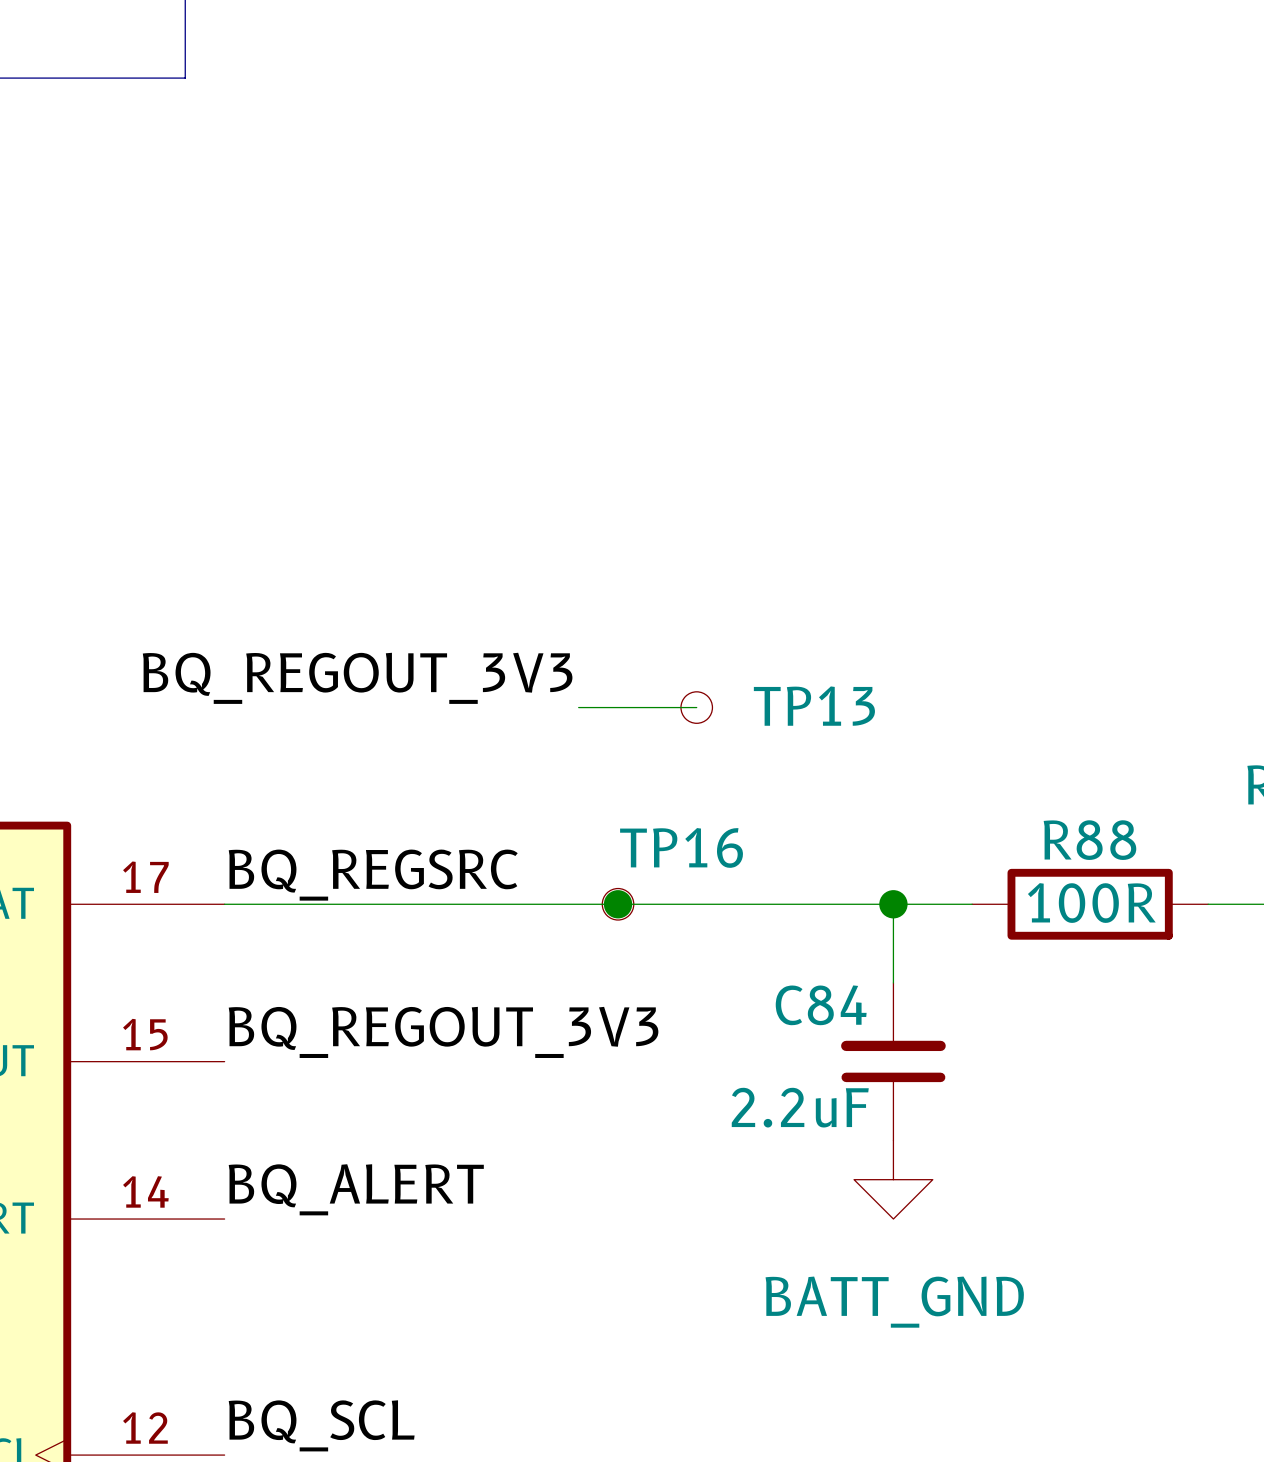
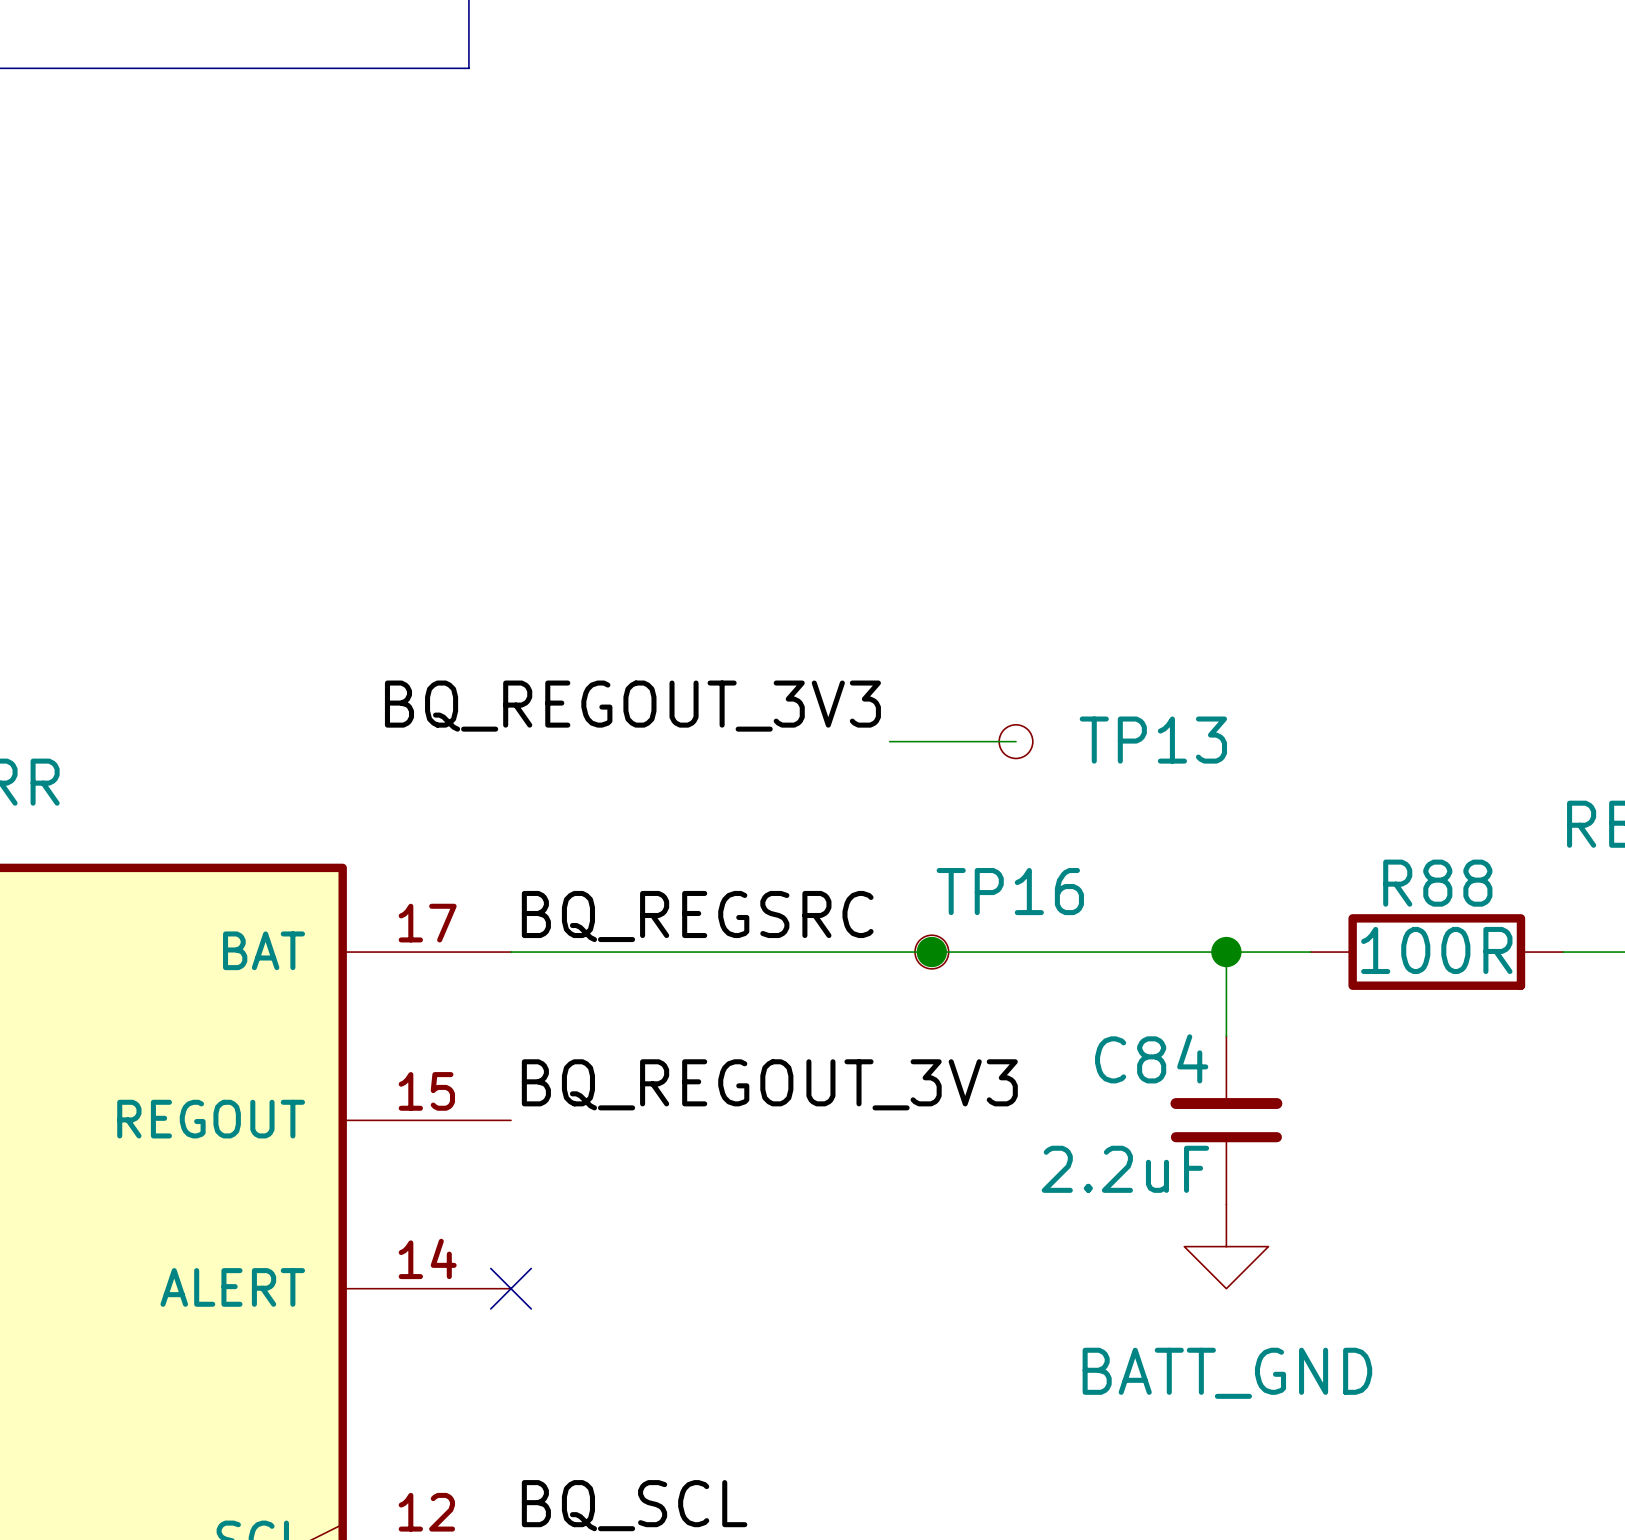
label: BQ_ALERT (356, 1189) -> none
no-connect mark: none -> (511, 1288)

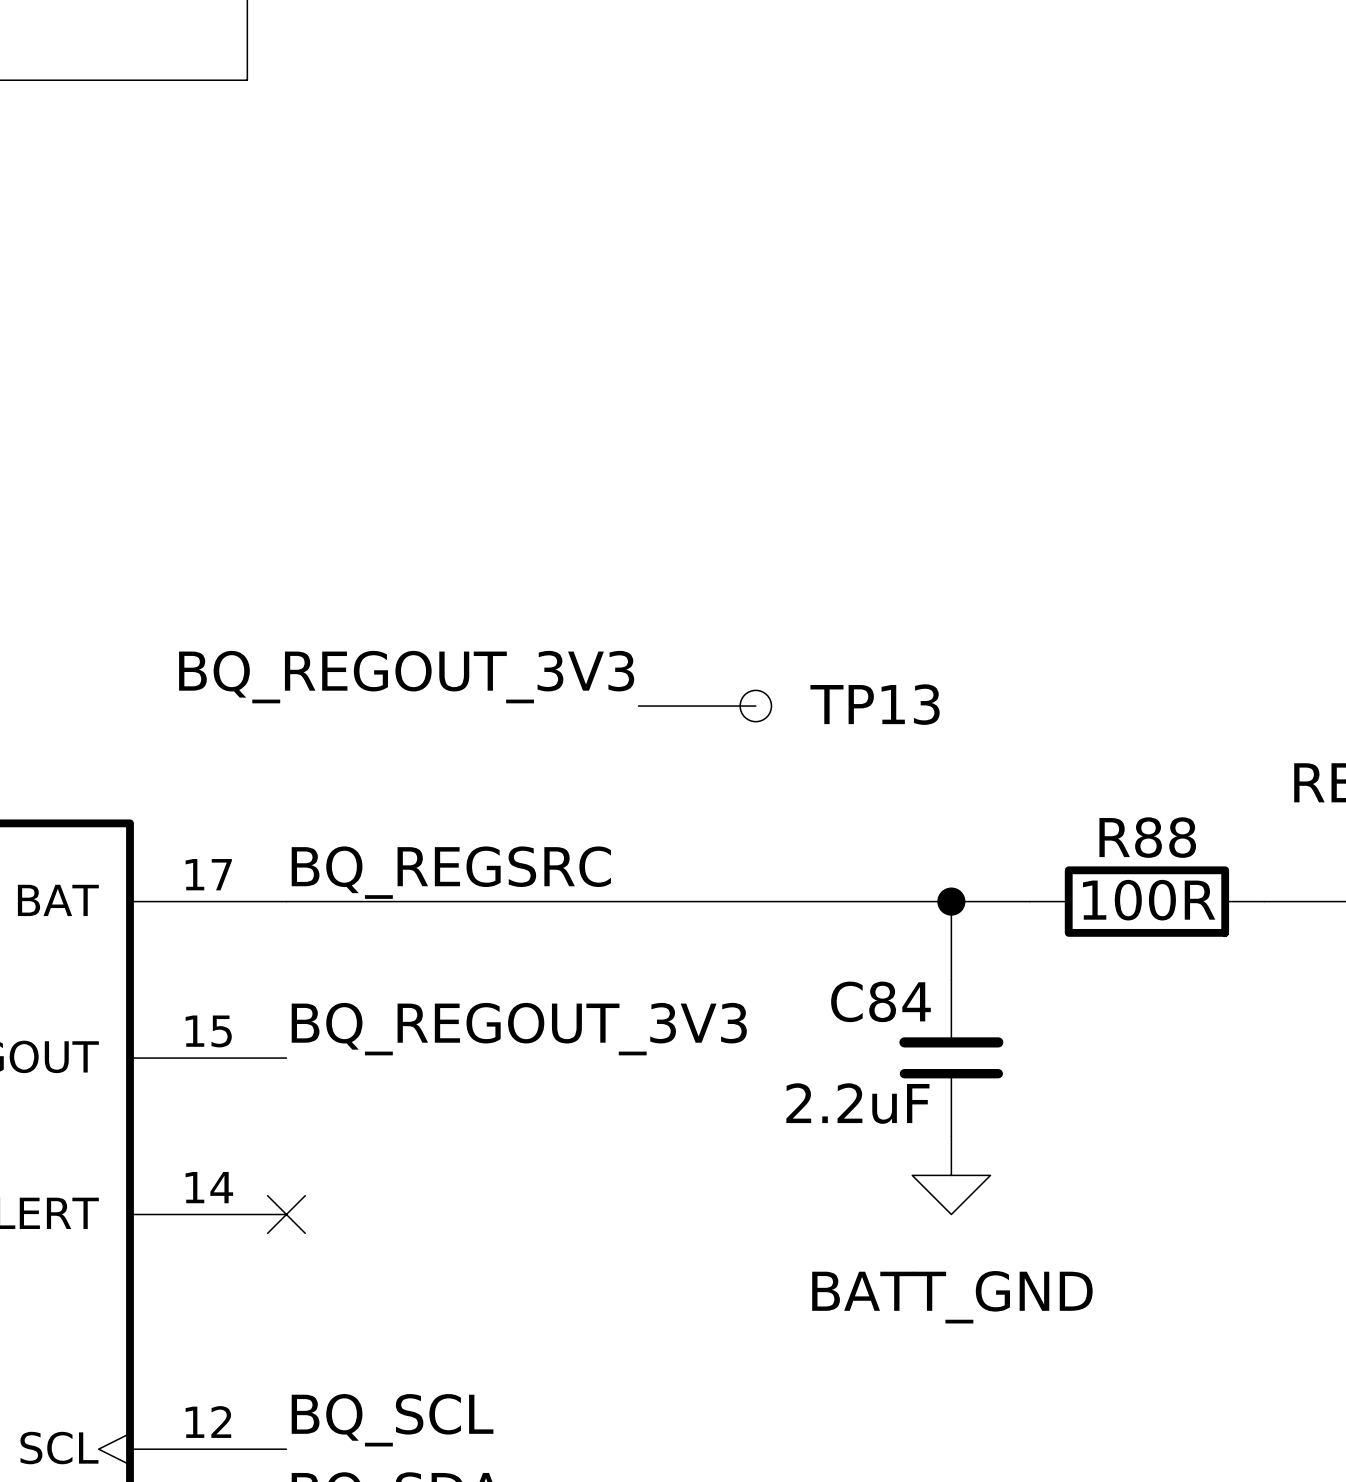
junction: (931, 952) -> none
TP16: (931, 952) -> none

